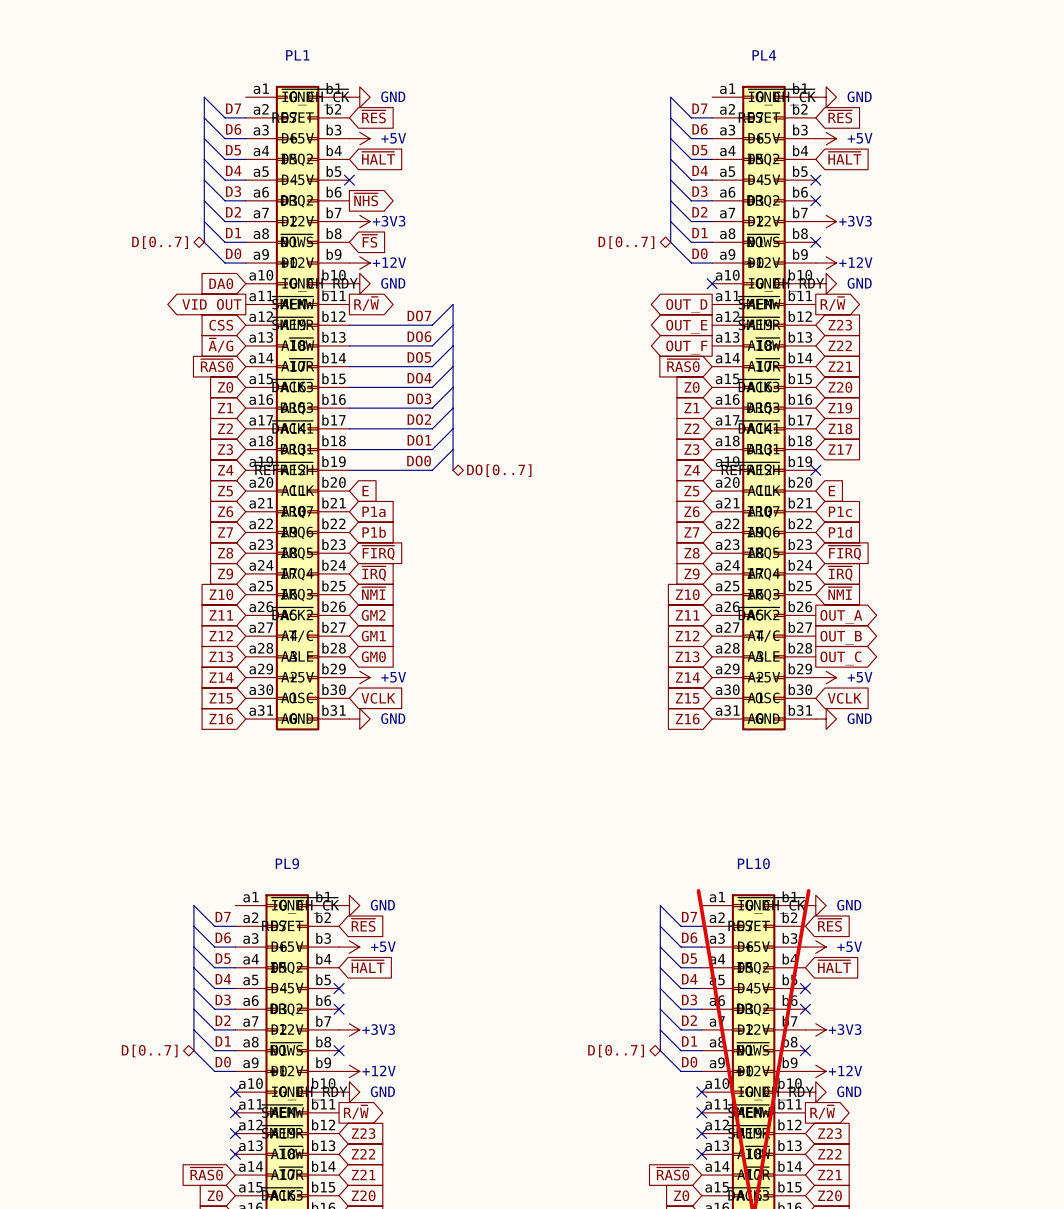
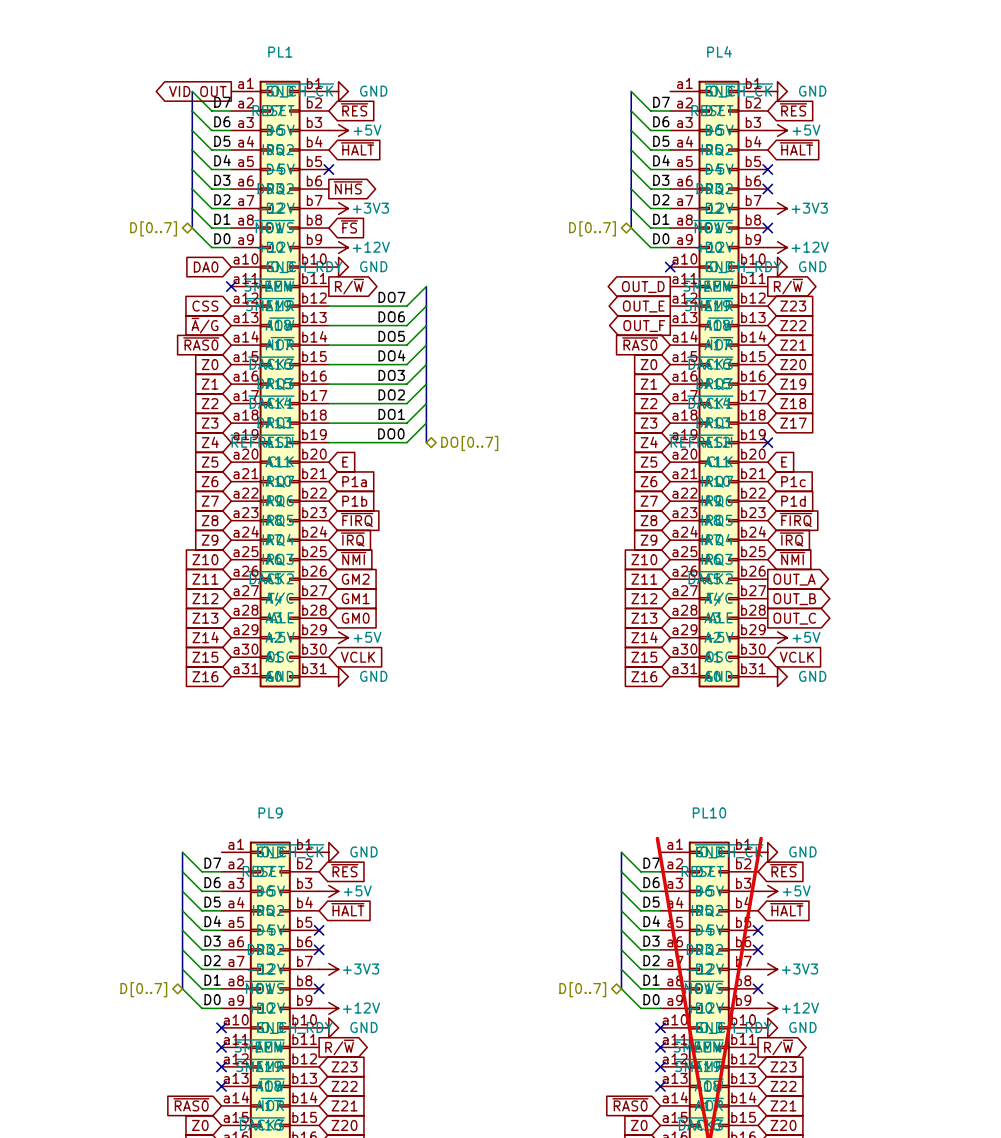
global label: none -> VID OUT (197, 91)
global label: VID OUT (211, 304) -> none
no-connect mark: none -> (231, 286)

